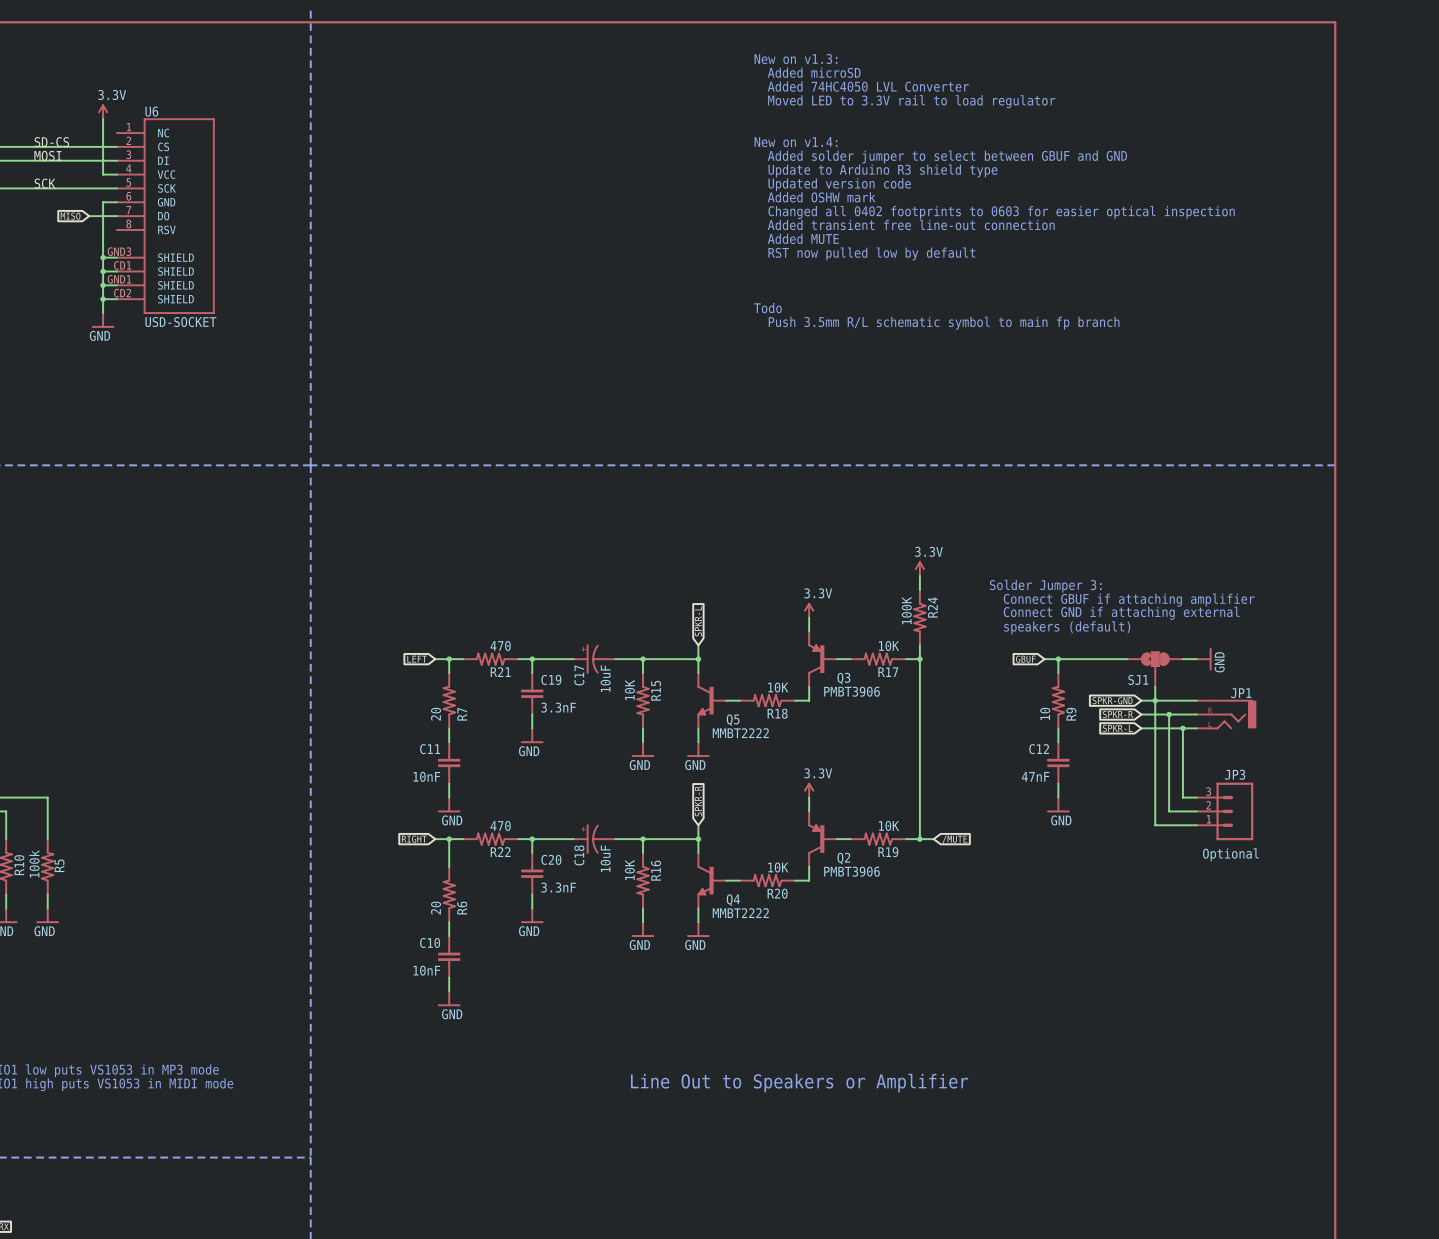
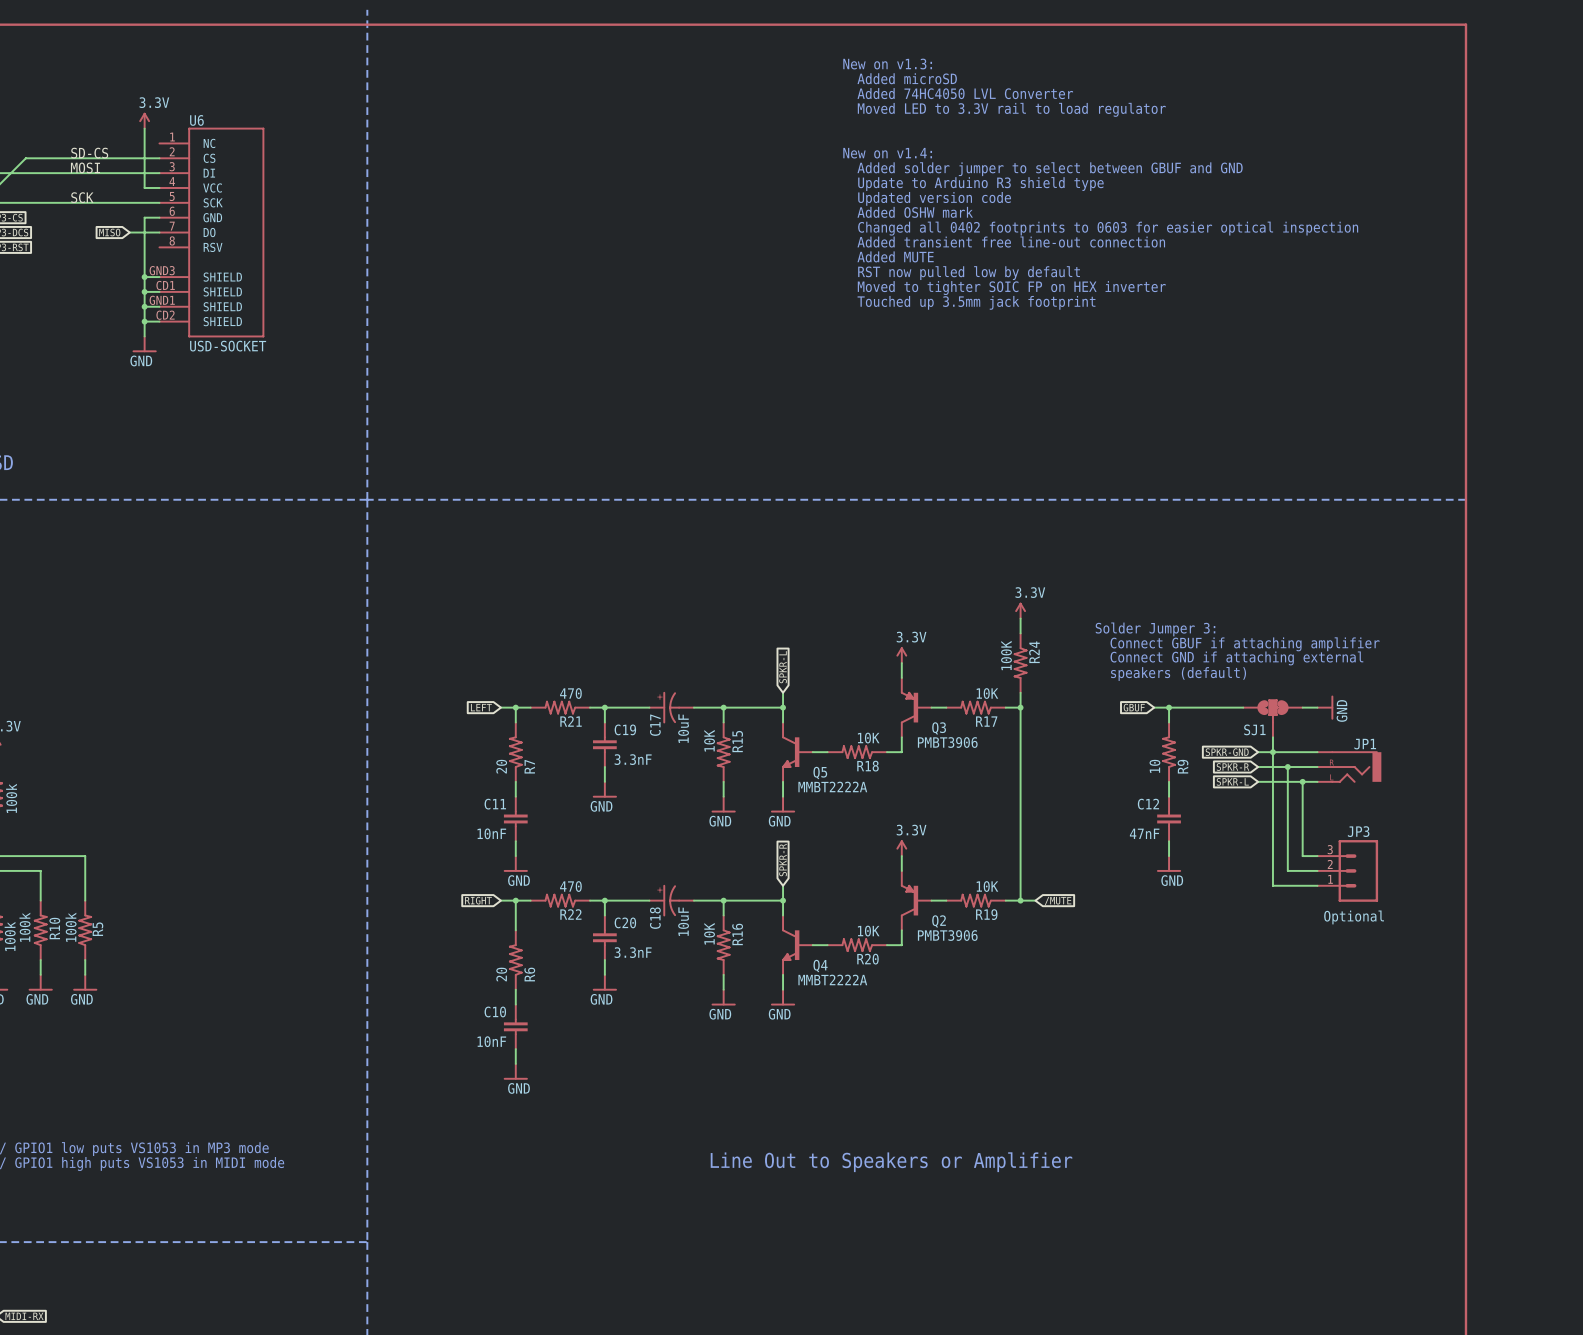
text: none -> Moved to tighter SOIC FP on HEX inverter (1011, 288)
text: none -> Touched up 3.5mm jack footprint (976, 302)
text: Todo (767, 308) -> none
text: Push 3.5mm R/L schematic symbol to main fp branch (944, 323) -> none
Q5 value: MMBT2222 (740, 733) -> MMBT2222A (832, 786)
Q4 value: MMBT2222 (740, 913) -> MMBT2222A (832, 979)

